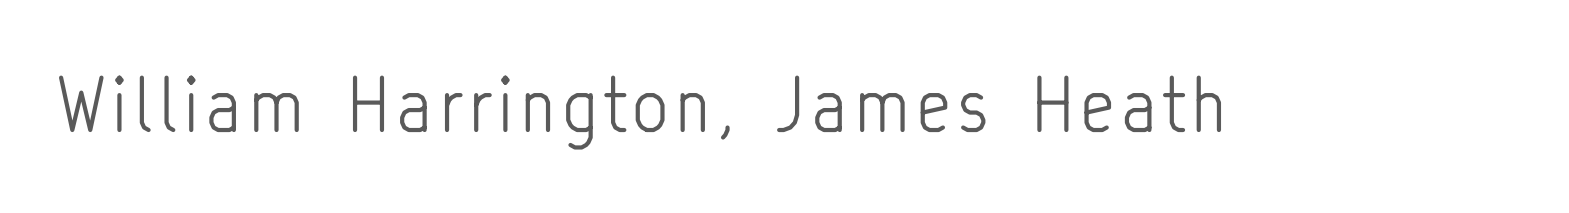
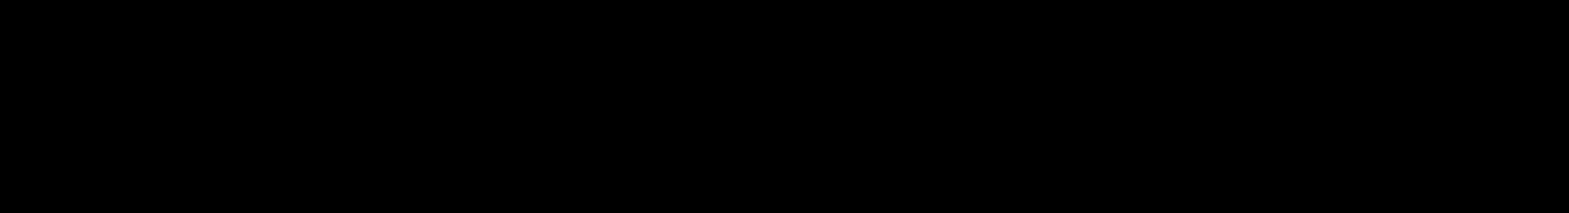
text: William Harrington, James Heath (640, 112) -> none

